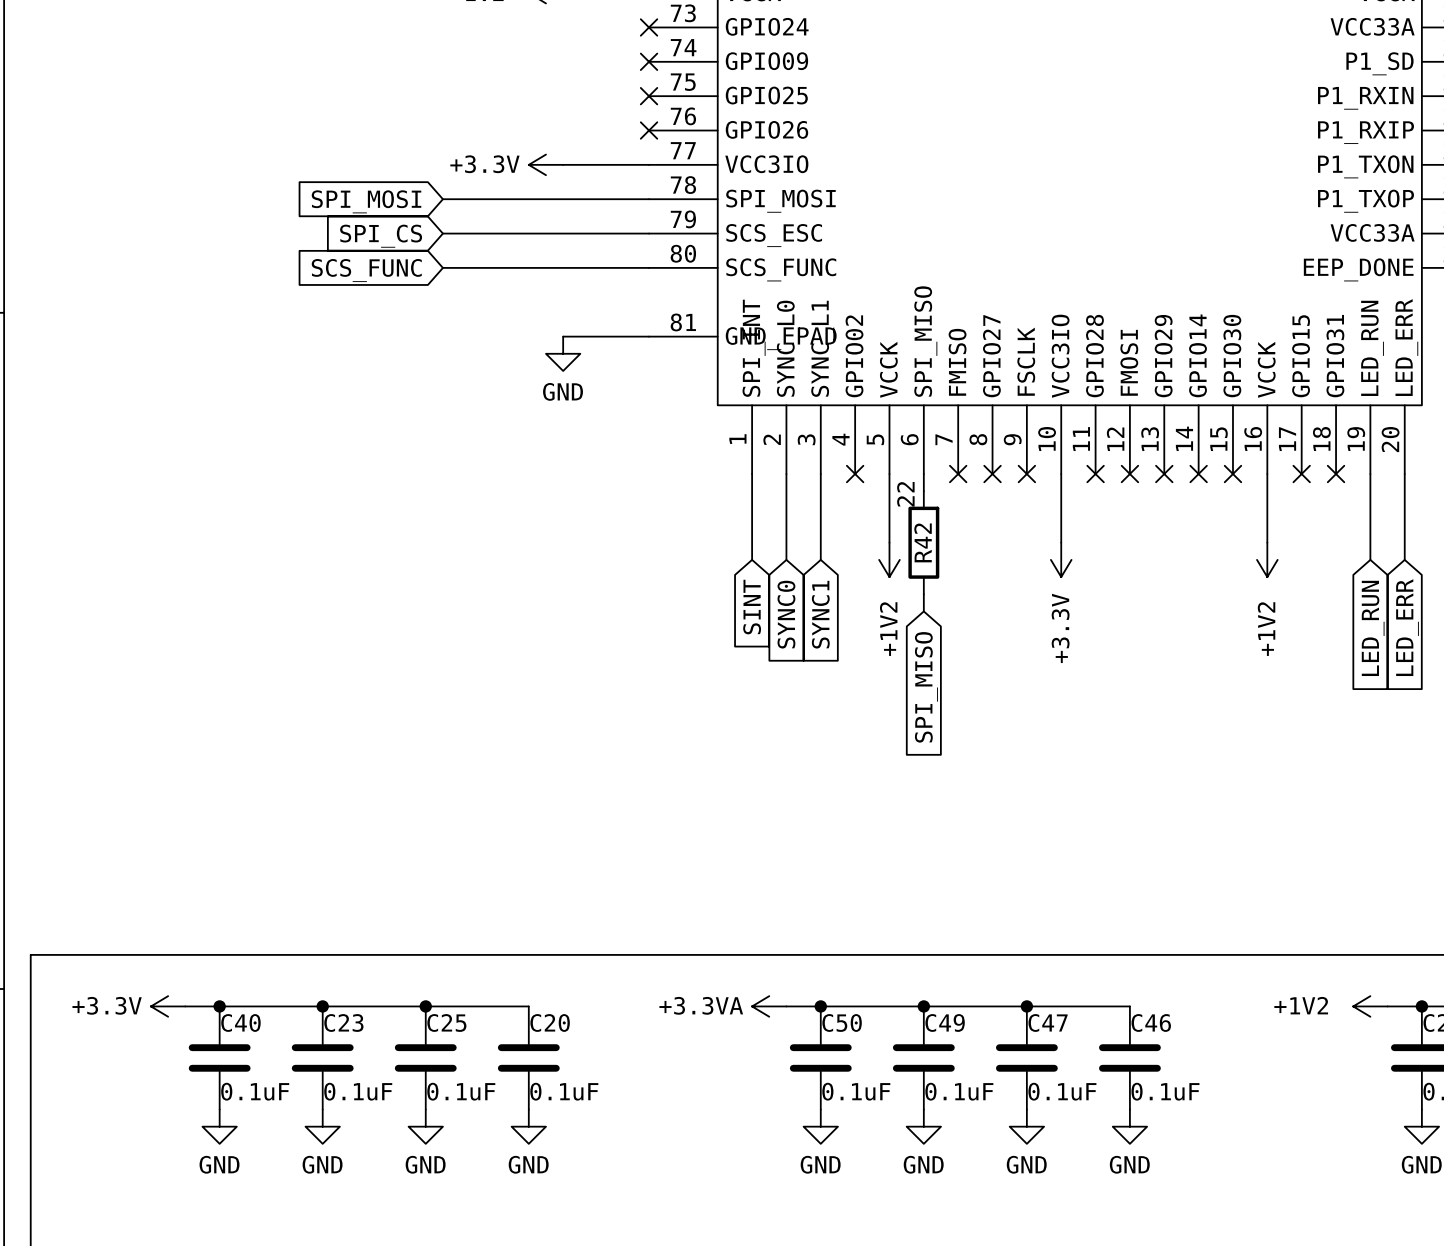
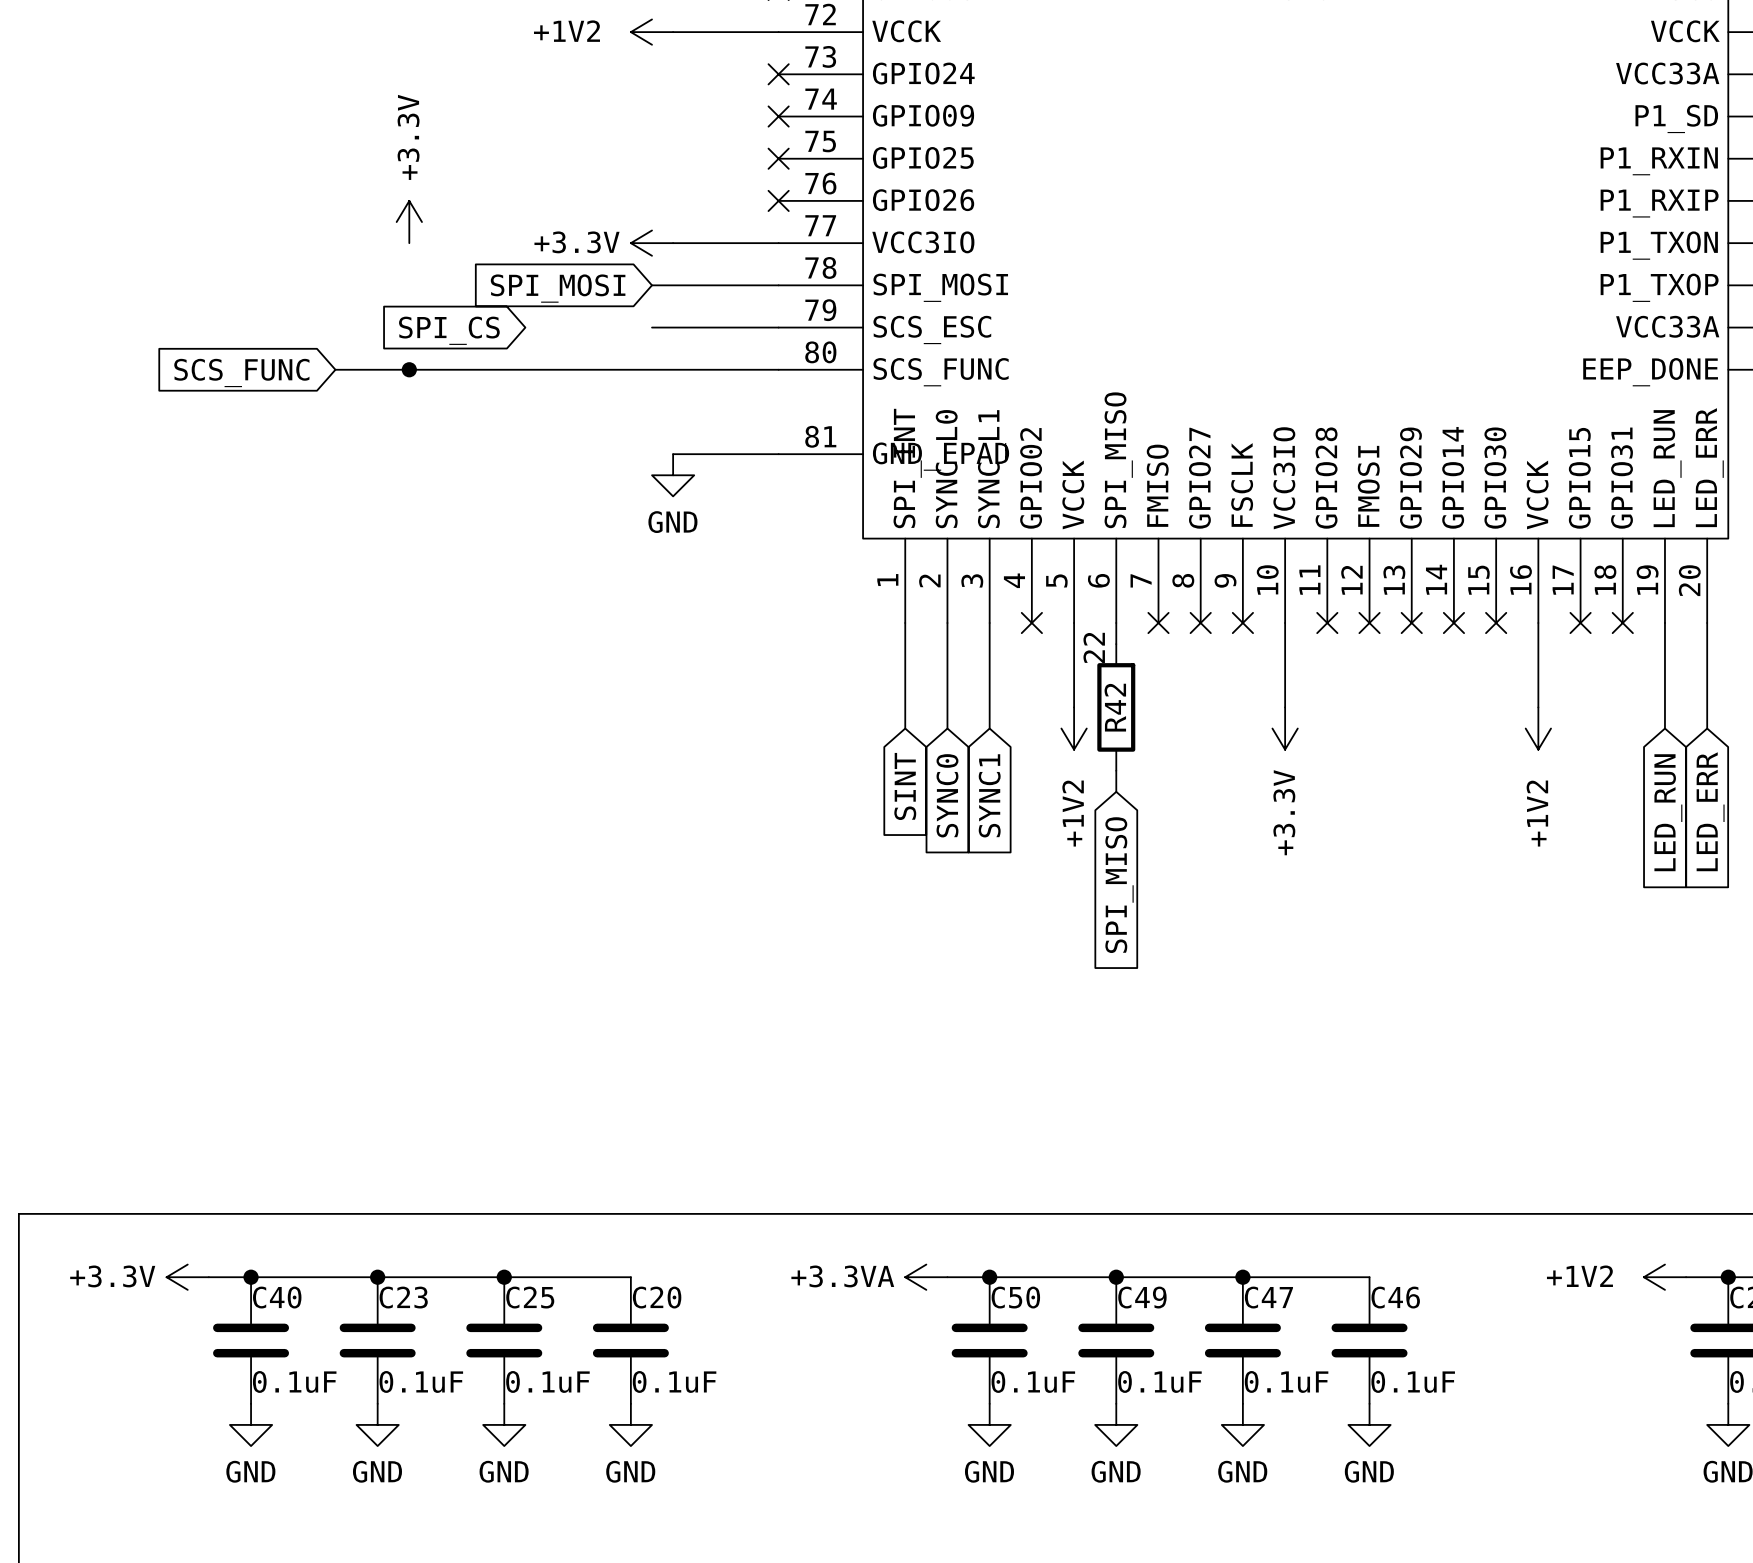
power symbol: none -> +3.3V (409, 222)
wire: (442, 199) (545, 199) -> none
global label position: SPI_MOSI (366, 201) -> SPI_MOSI (558, 288)
wire: (442, 233) (545, 233) -> none
wire: none -> (335, 369) (525, 369)
junction: none -> (409, 369)
global label position: SCS_FUNC (366, 270) -> SCS_FUNC (241, 372)

